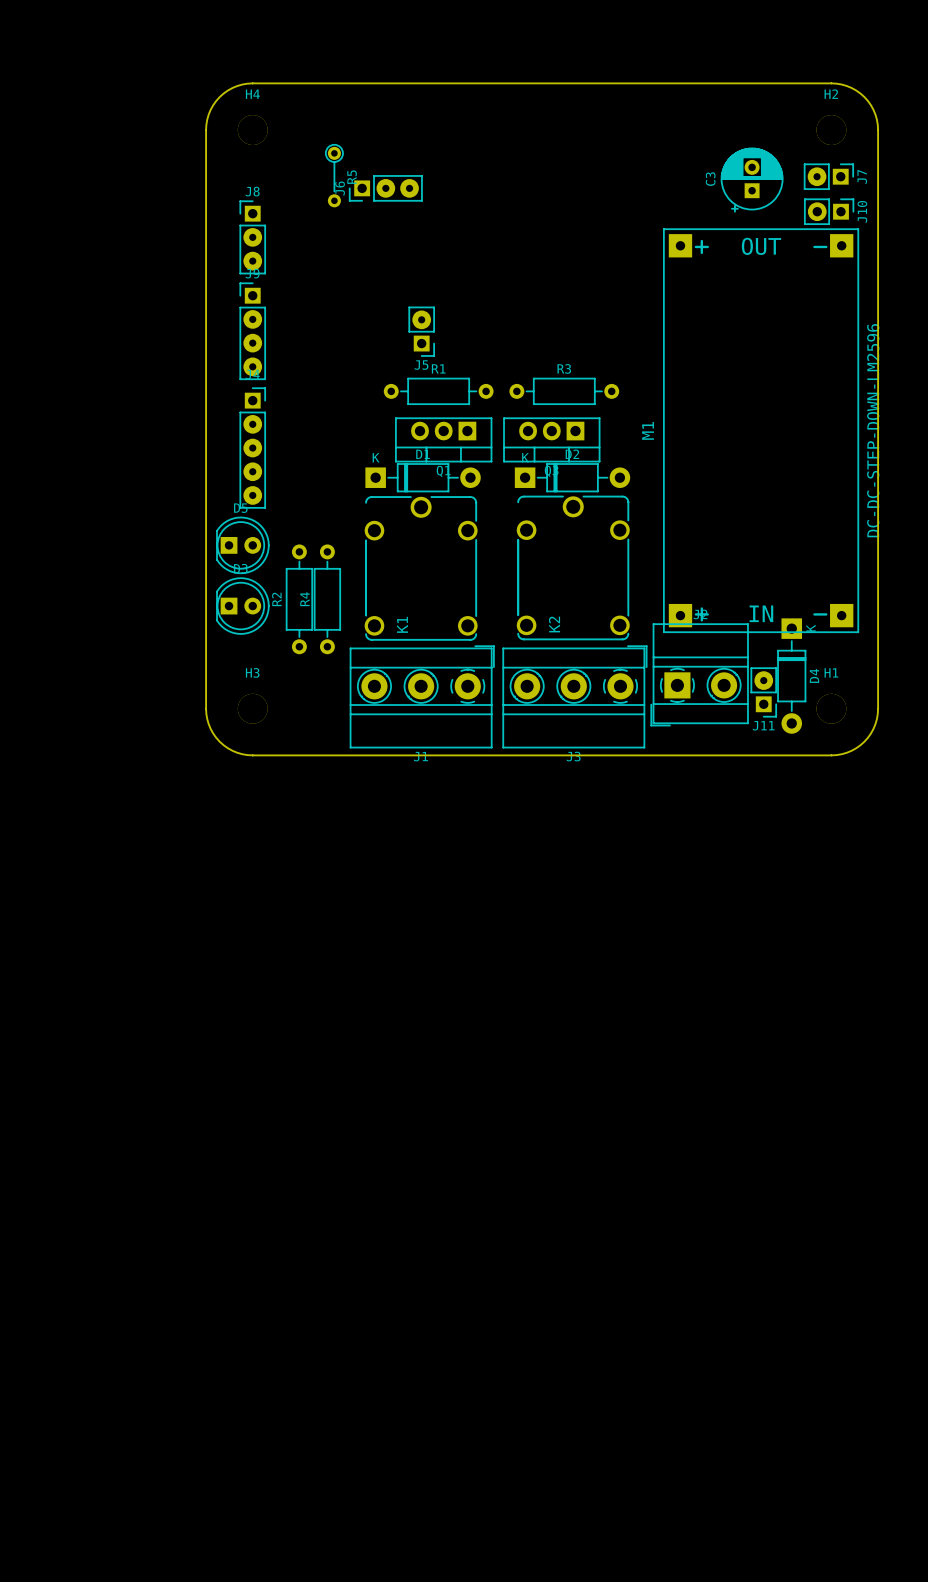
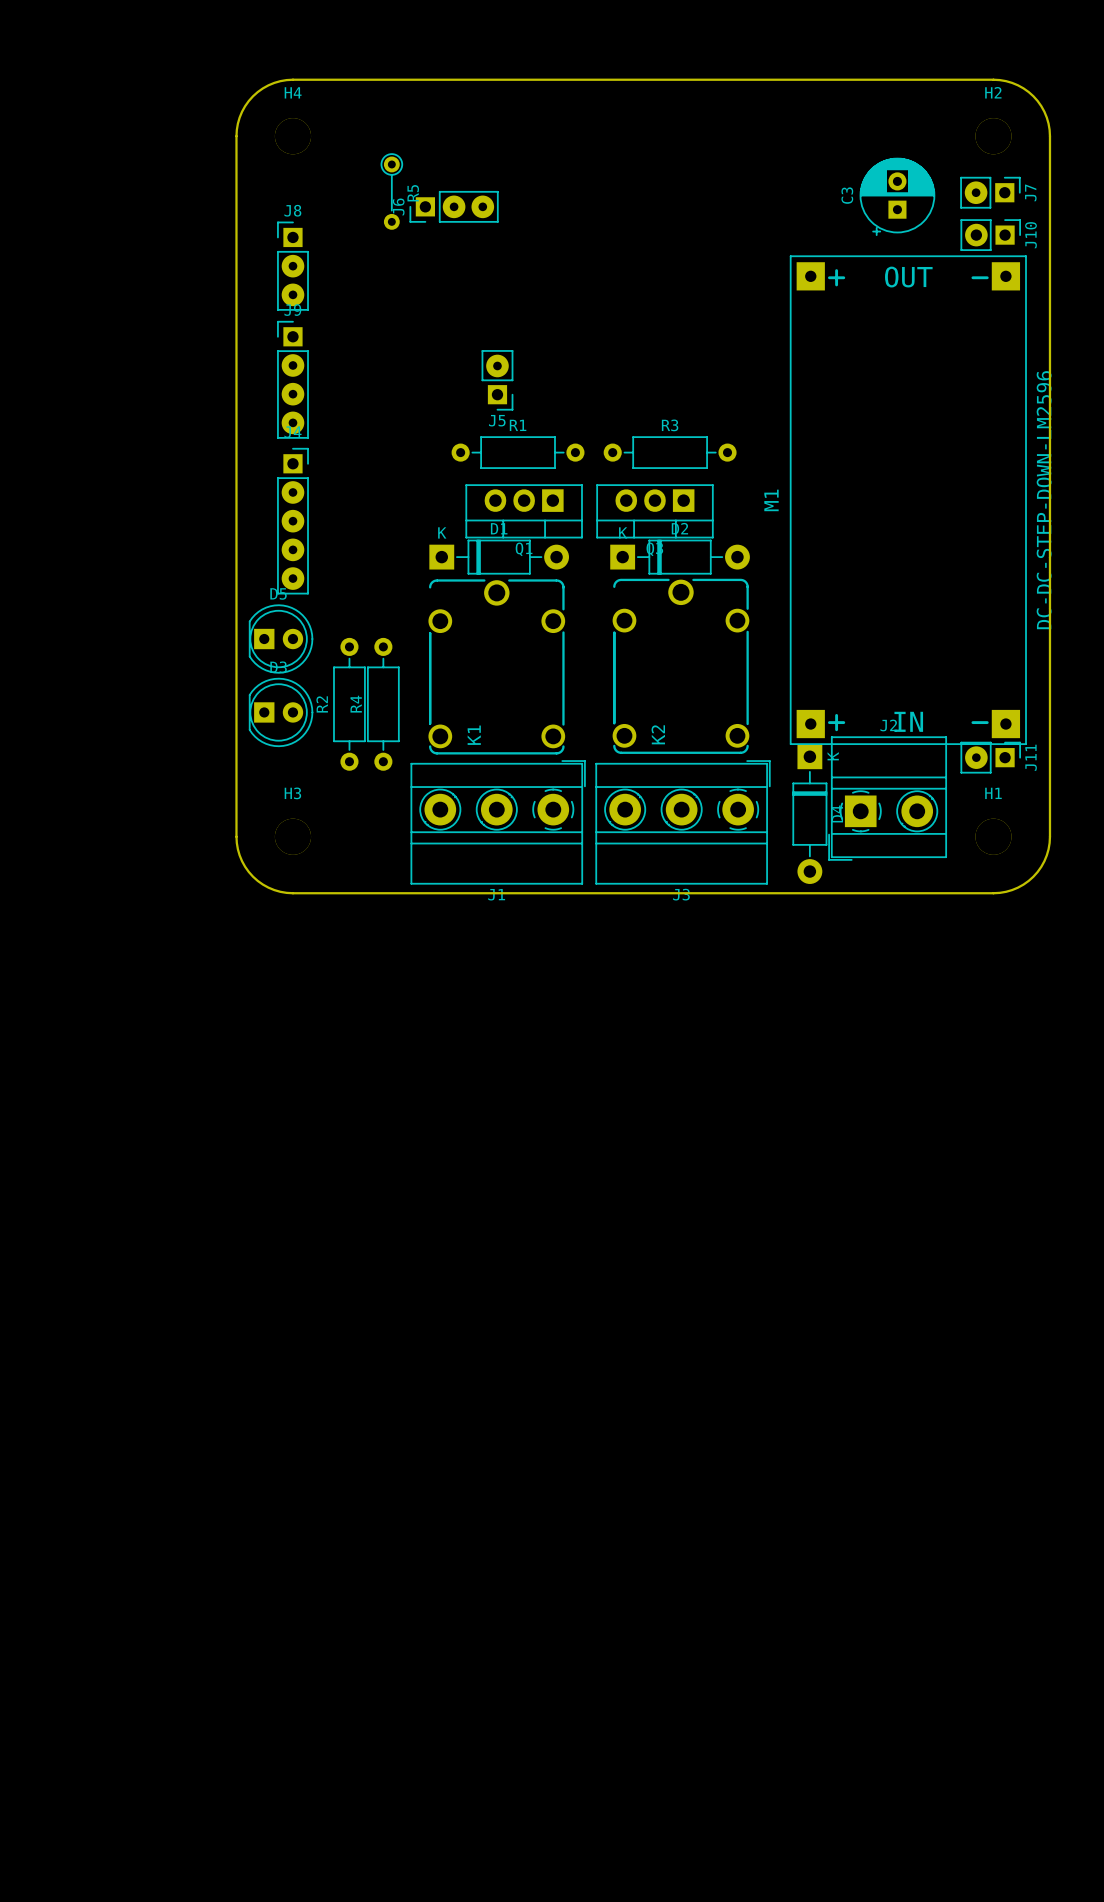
J2 position: (699, 674) -> (887, 798)
D4 position: (791, 676) -> (809, 814)
J11 rotation: 0° (763, 692) -> 90° counterclockwise (990, 757)
J11 position: (763, 692) -> (990, 757)

